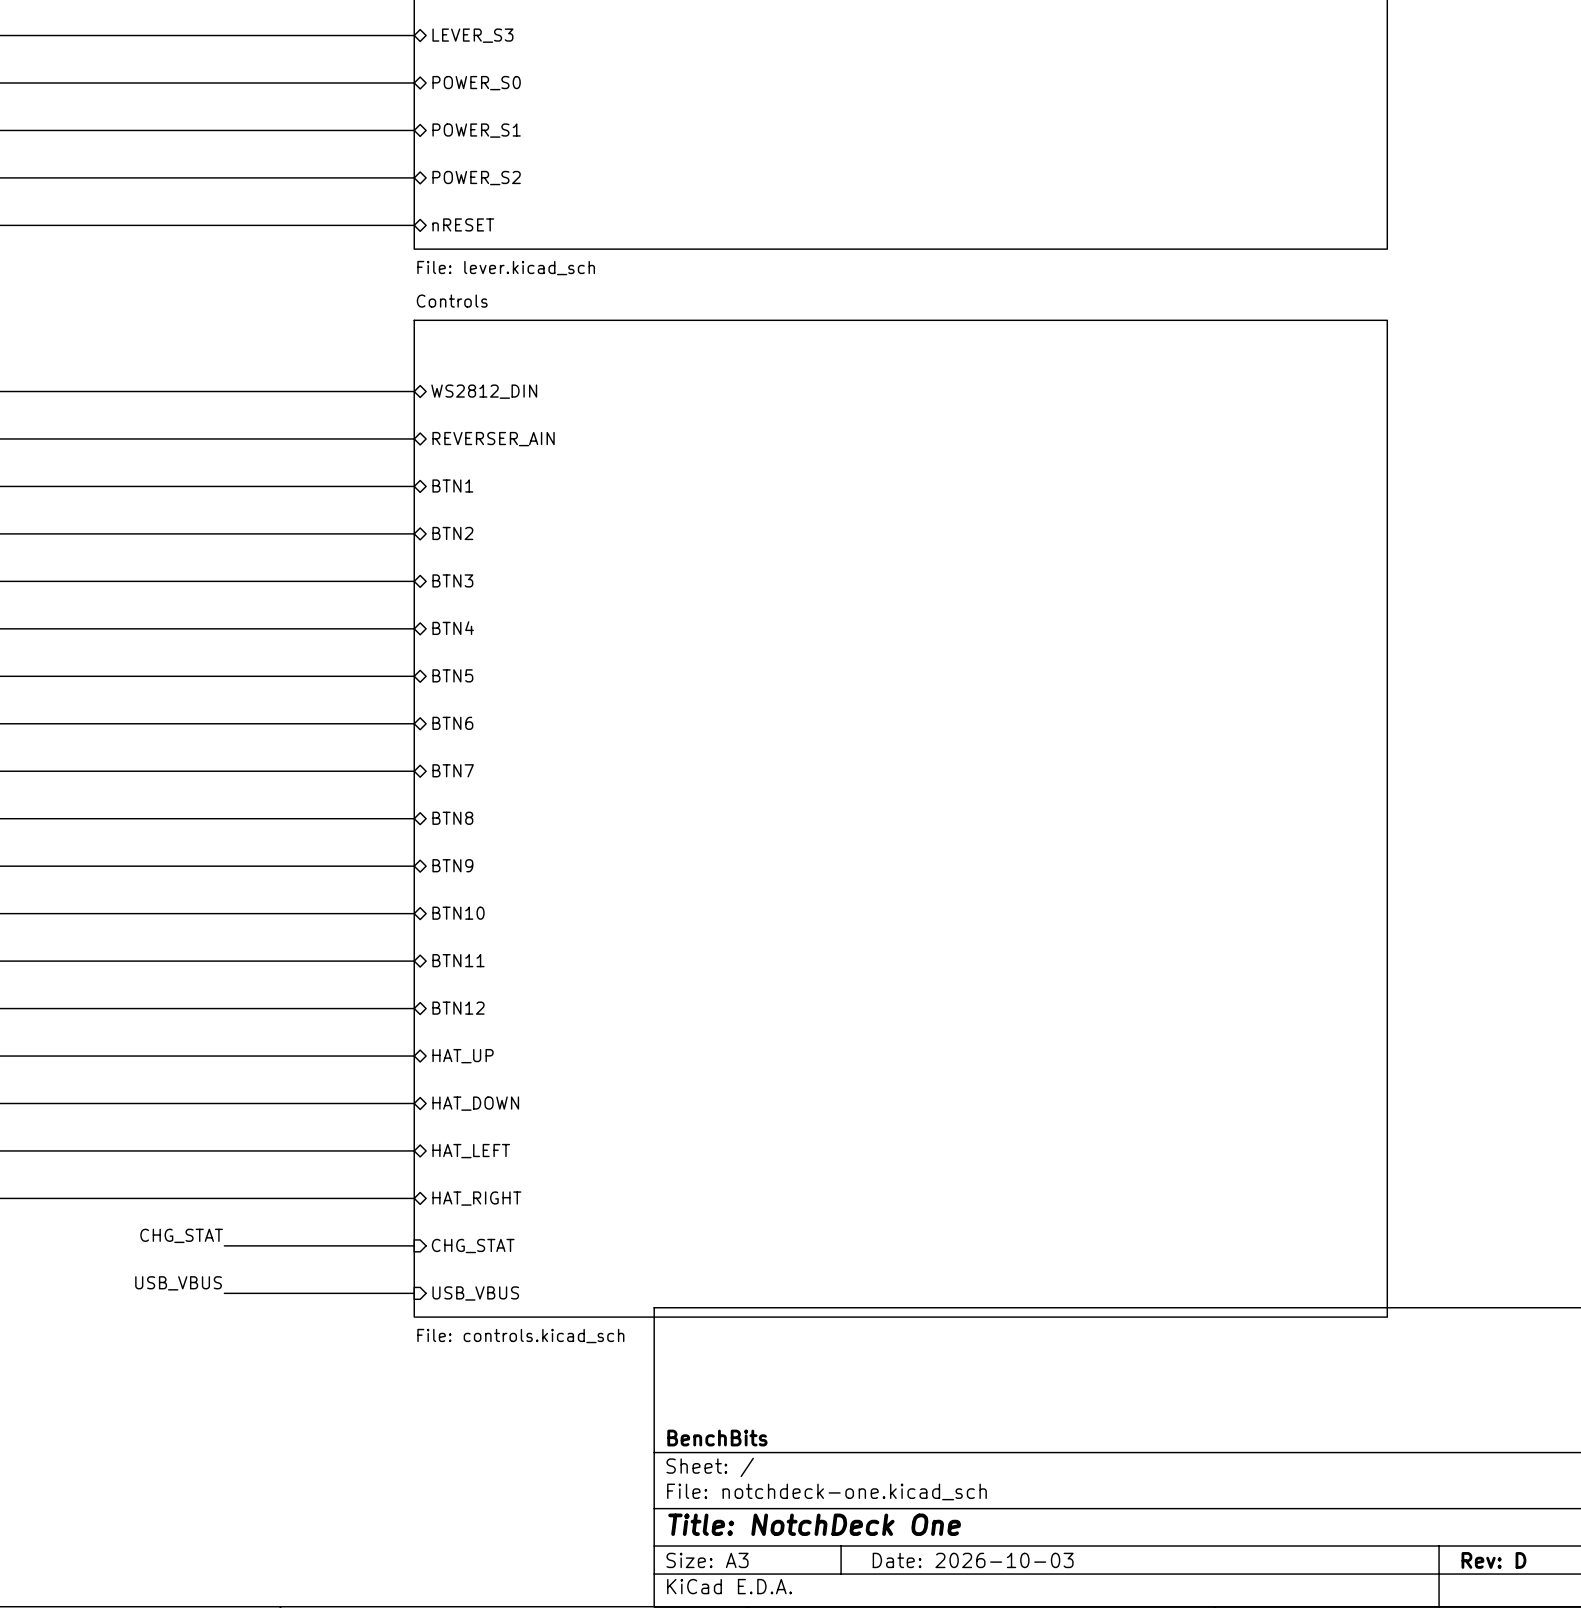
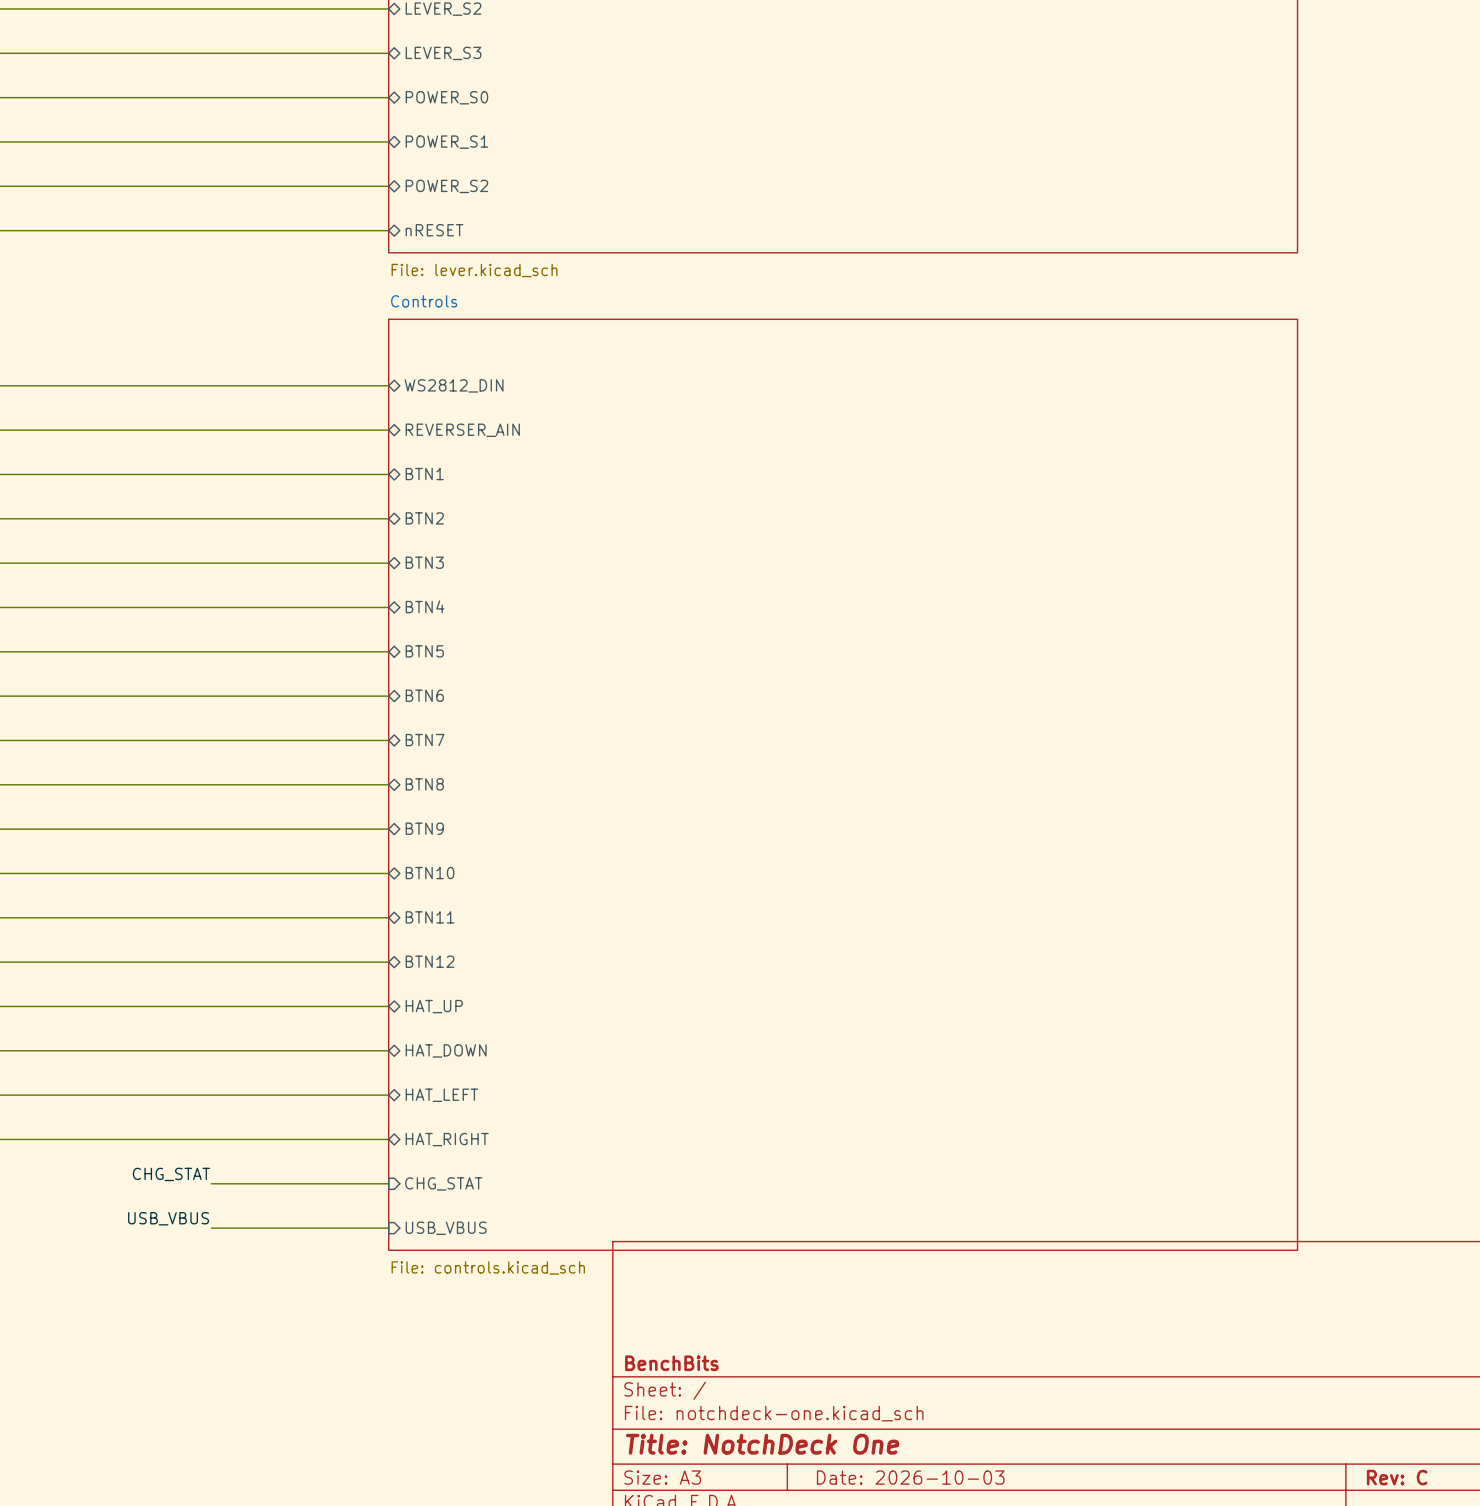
title block: Rev: D (1493, 1560) -> Rev: C (1397, 1477)

